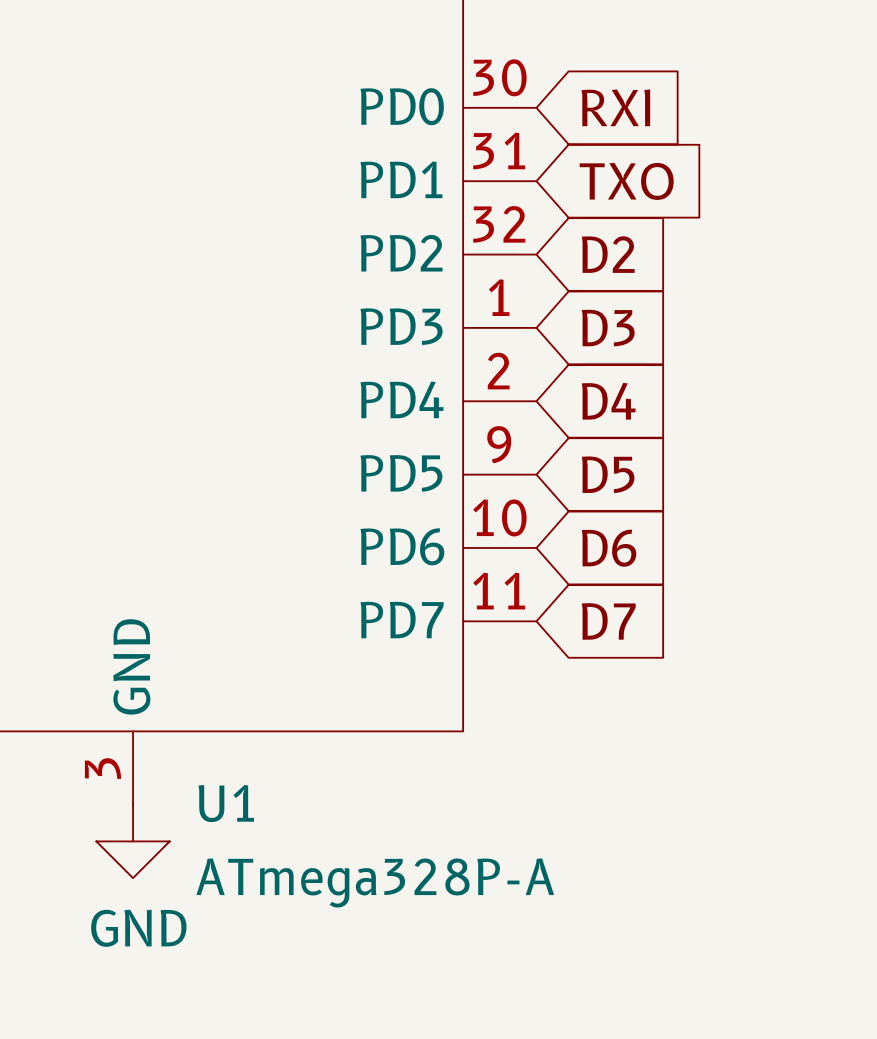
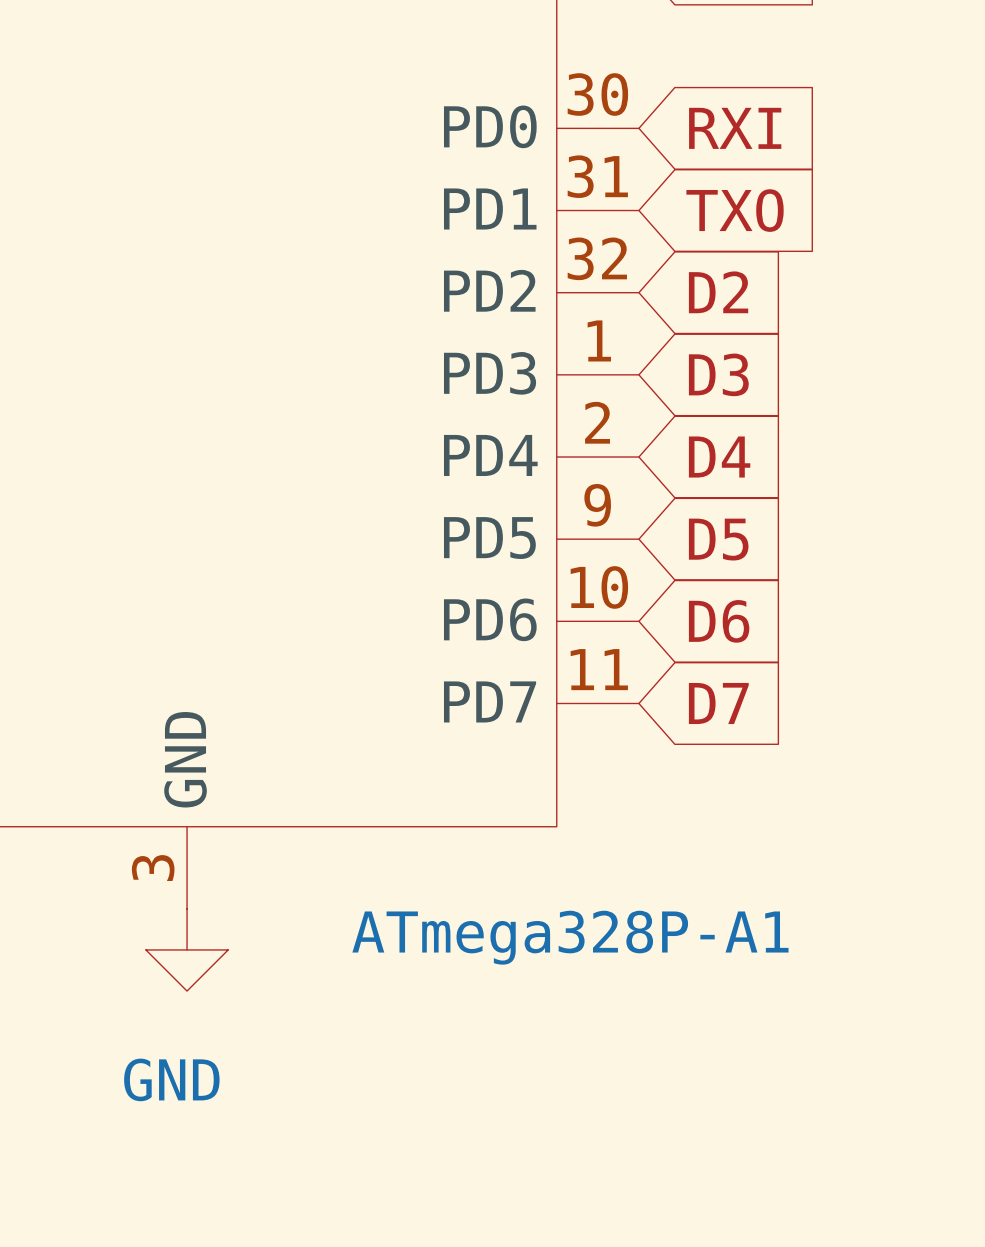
U1 name: U1 (226, 803) -> ATmega328P-A1 (570, 937)
GND: none -> (187, 949)
power symbol: GND (133, 841) -> none
U1 value: ATmega328P-A (375, 882) -> none

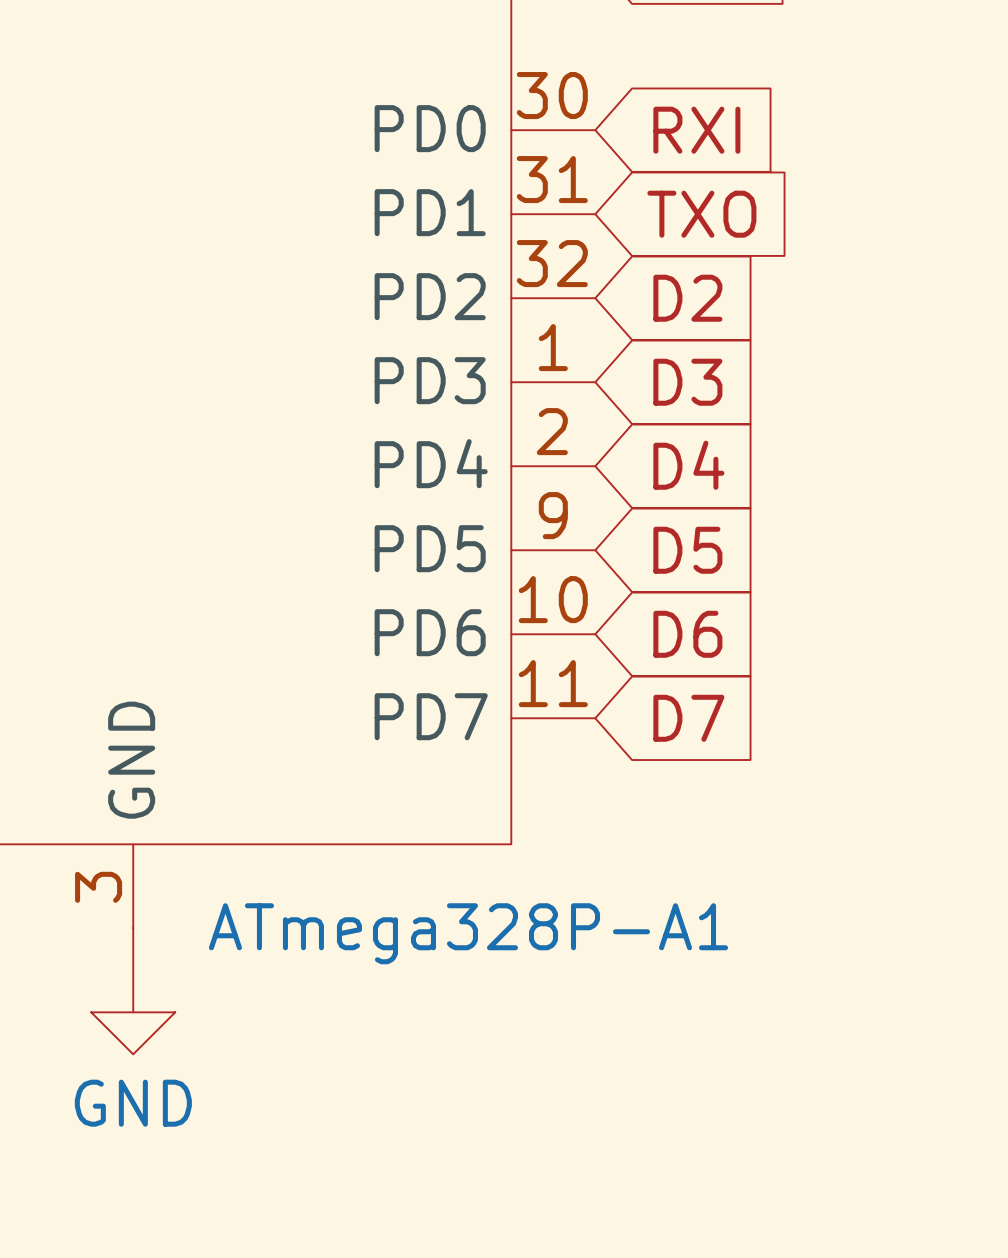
GND symbol: [145, 908, 229, 992] -> [91, 928, 176, 1055]
ATmega328P-A1 name position: ATmega328P-A1 (570, 937) -> ATmega328P-A1 (468, 933)

